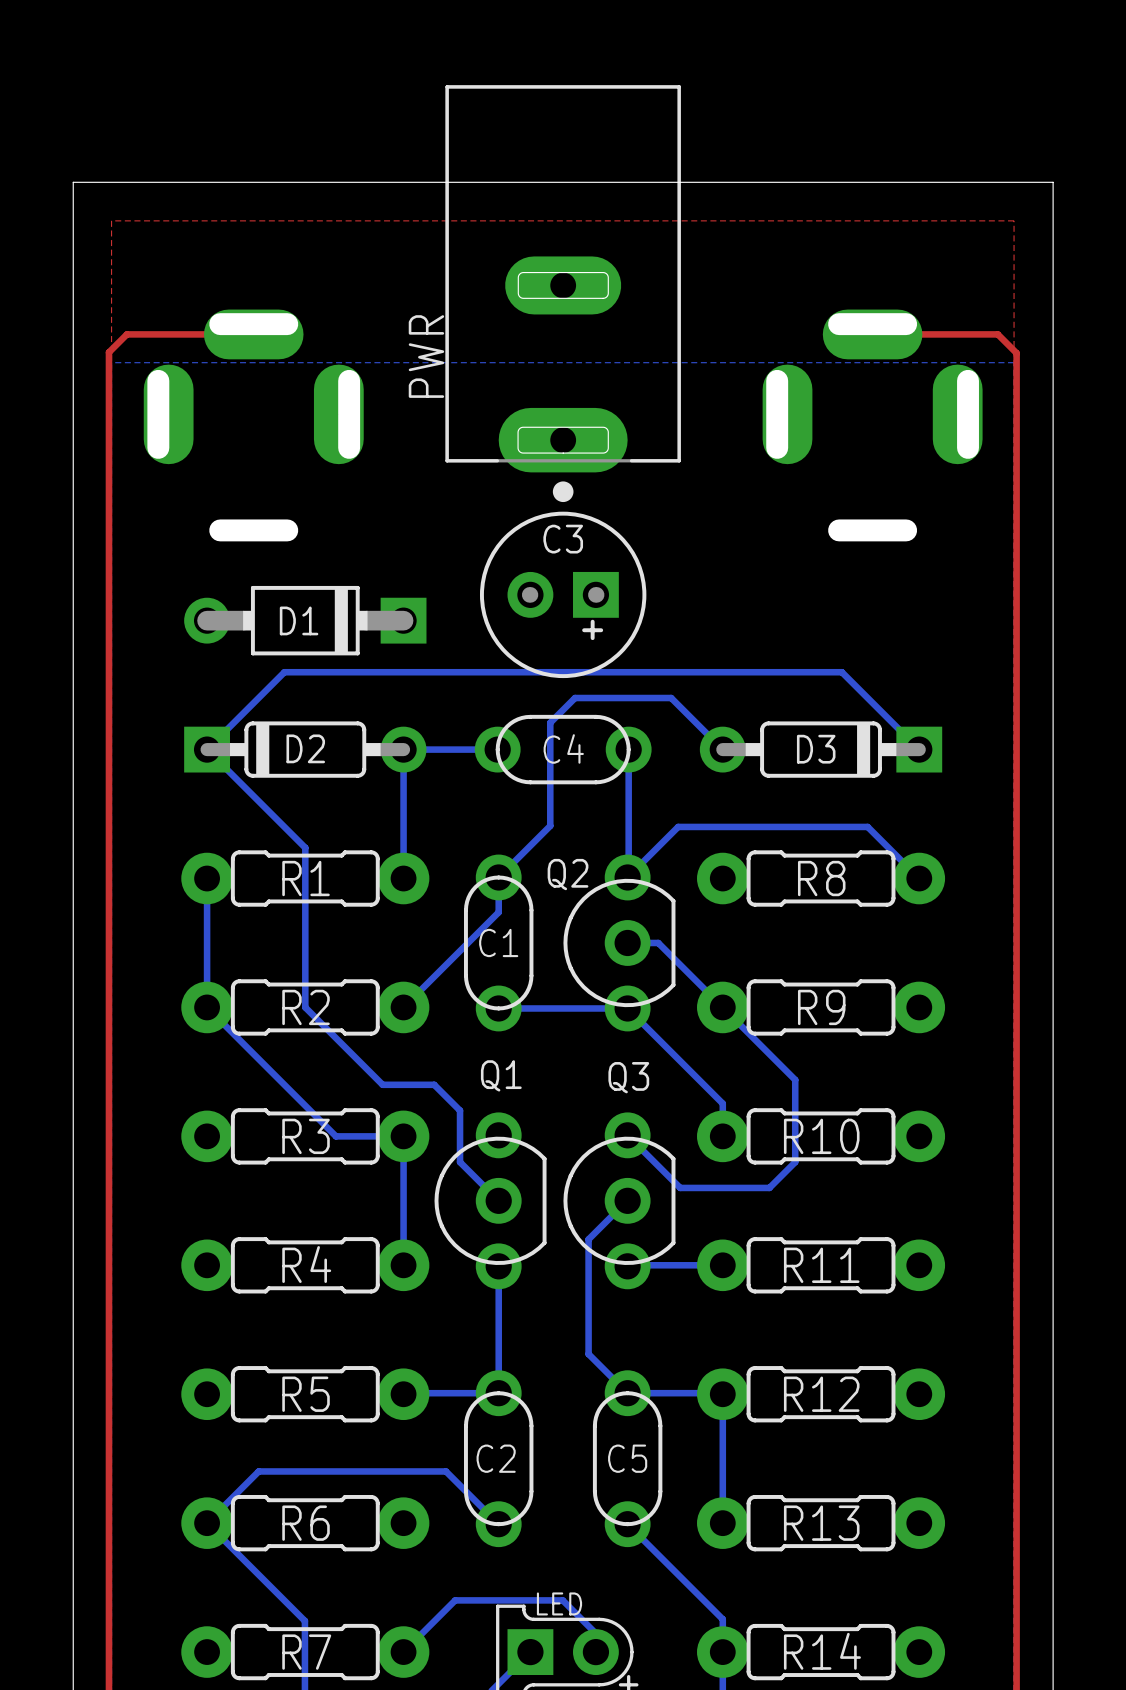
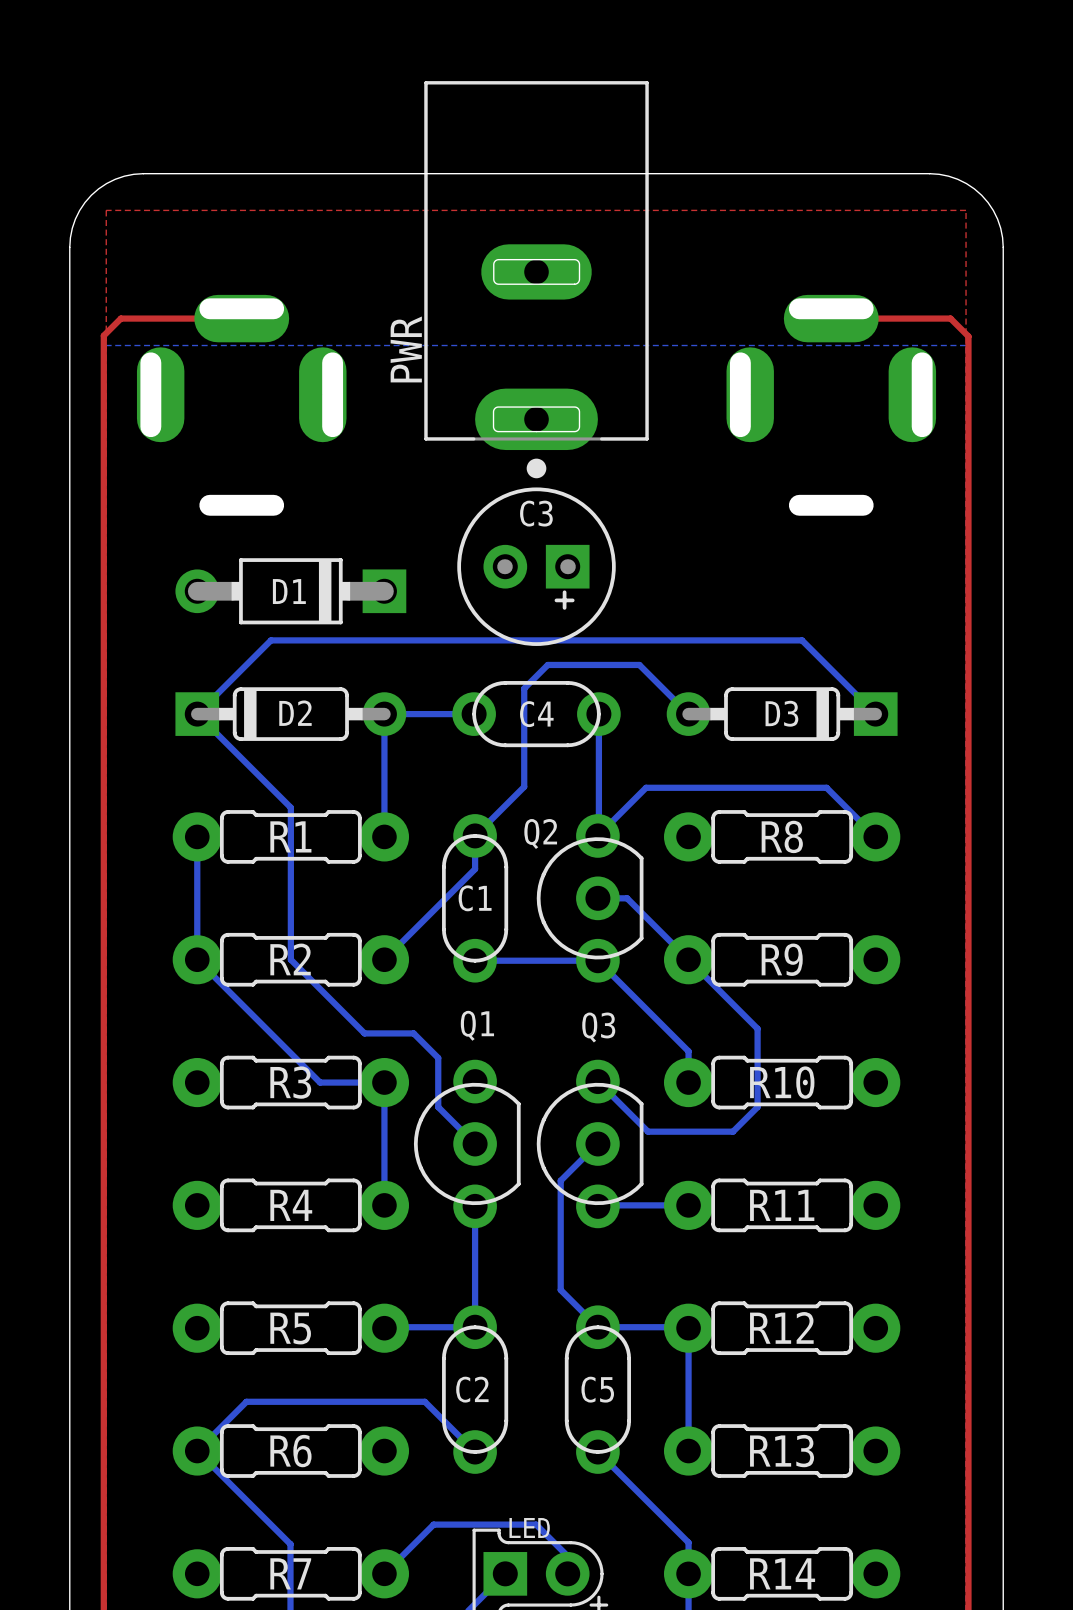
board edge: (150, 182) (73, 182) (73, 259) -> (143, 173) (115, 179) (91, 195) (75, 219) (69, 247)
board edge: (975, 182) (1053, 182) (1053, 259) -> (929, 173) (957, 179) (981, 195) (997, 219) (1003, 247)

